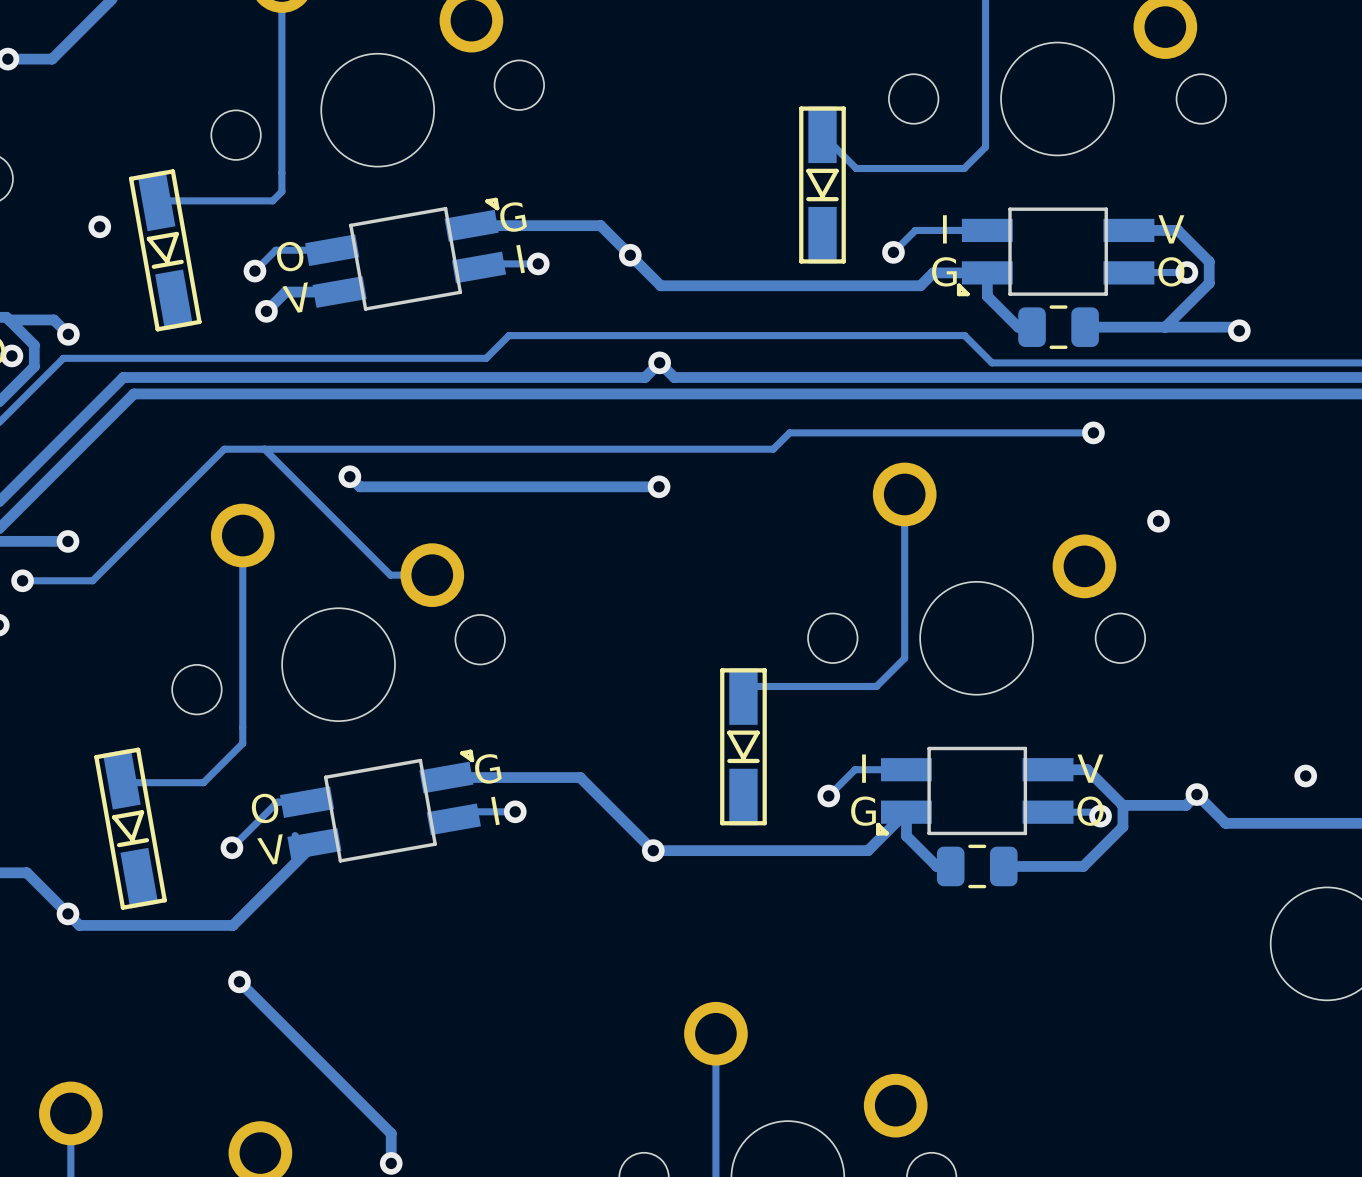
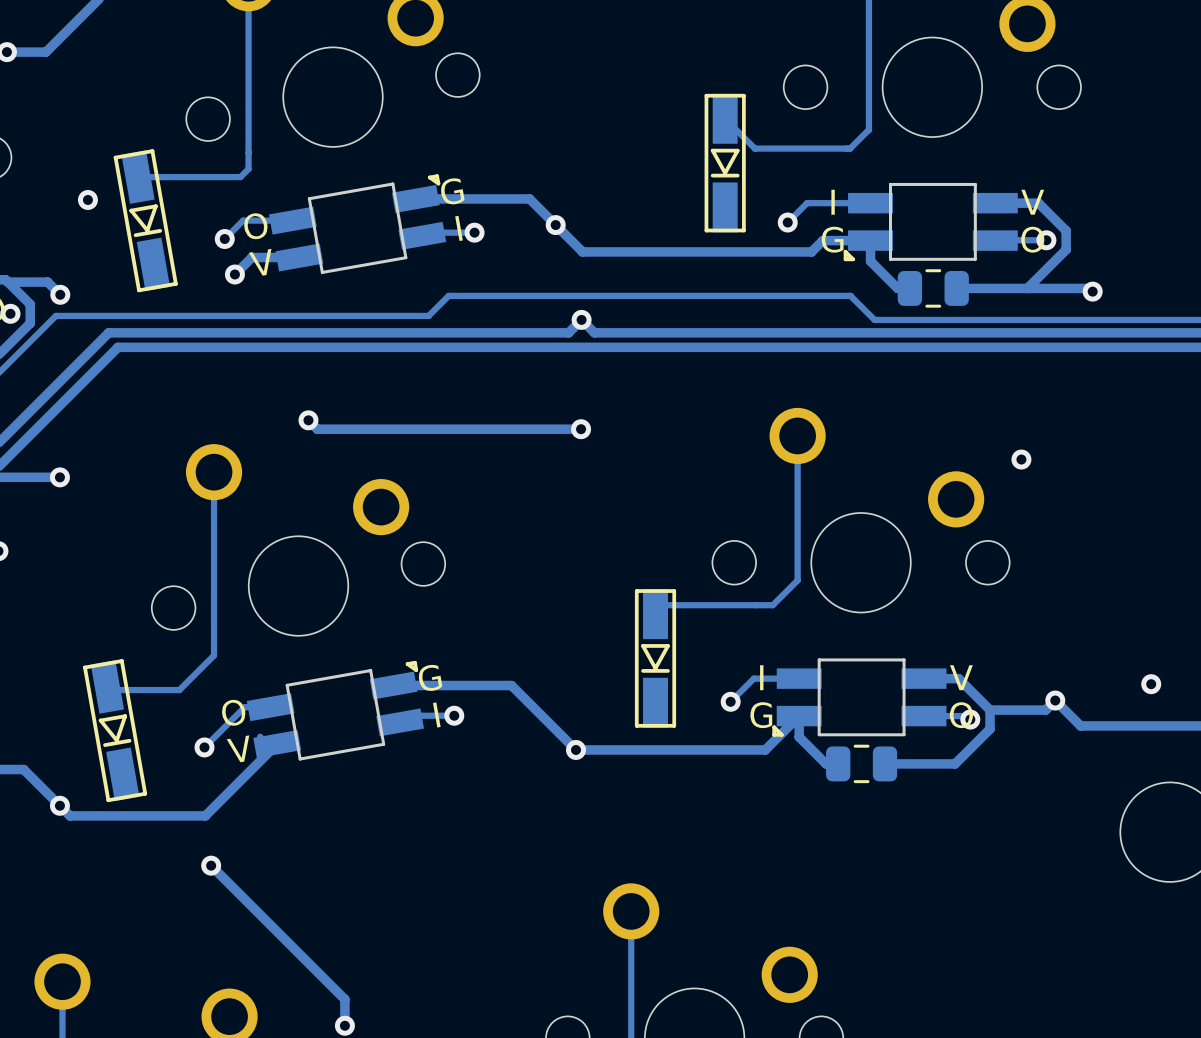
track: (1093, 432) (789, 432) (773, 449) (224, 449) (92, 580) (22, 580) -> none
via: (1093, 432) -> none
track: (264, 449) (390, 575) (432, 575) -> none
via: (22, 580) -> none

